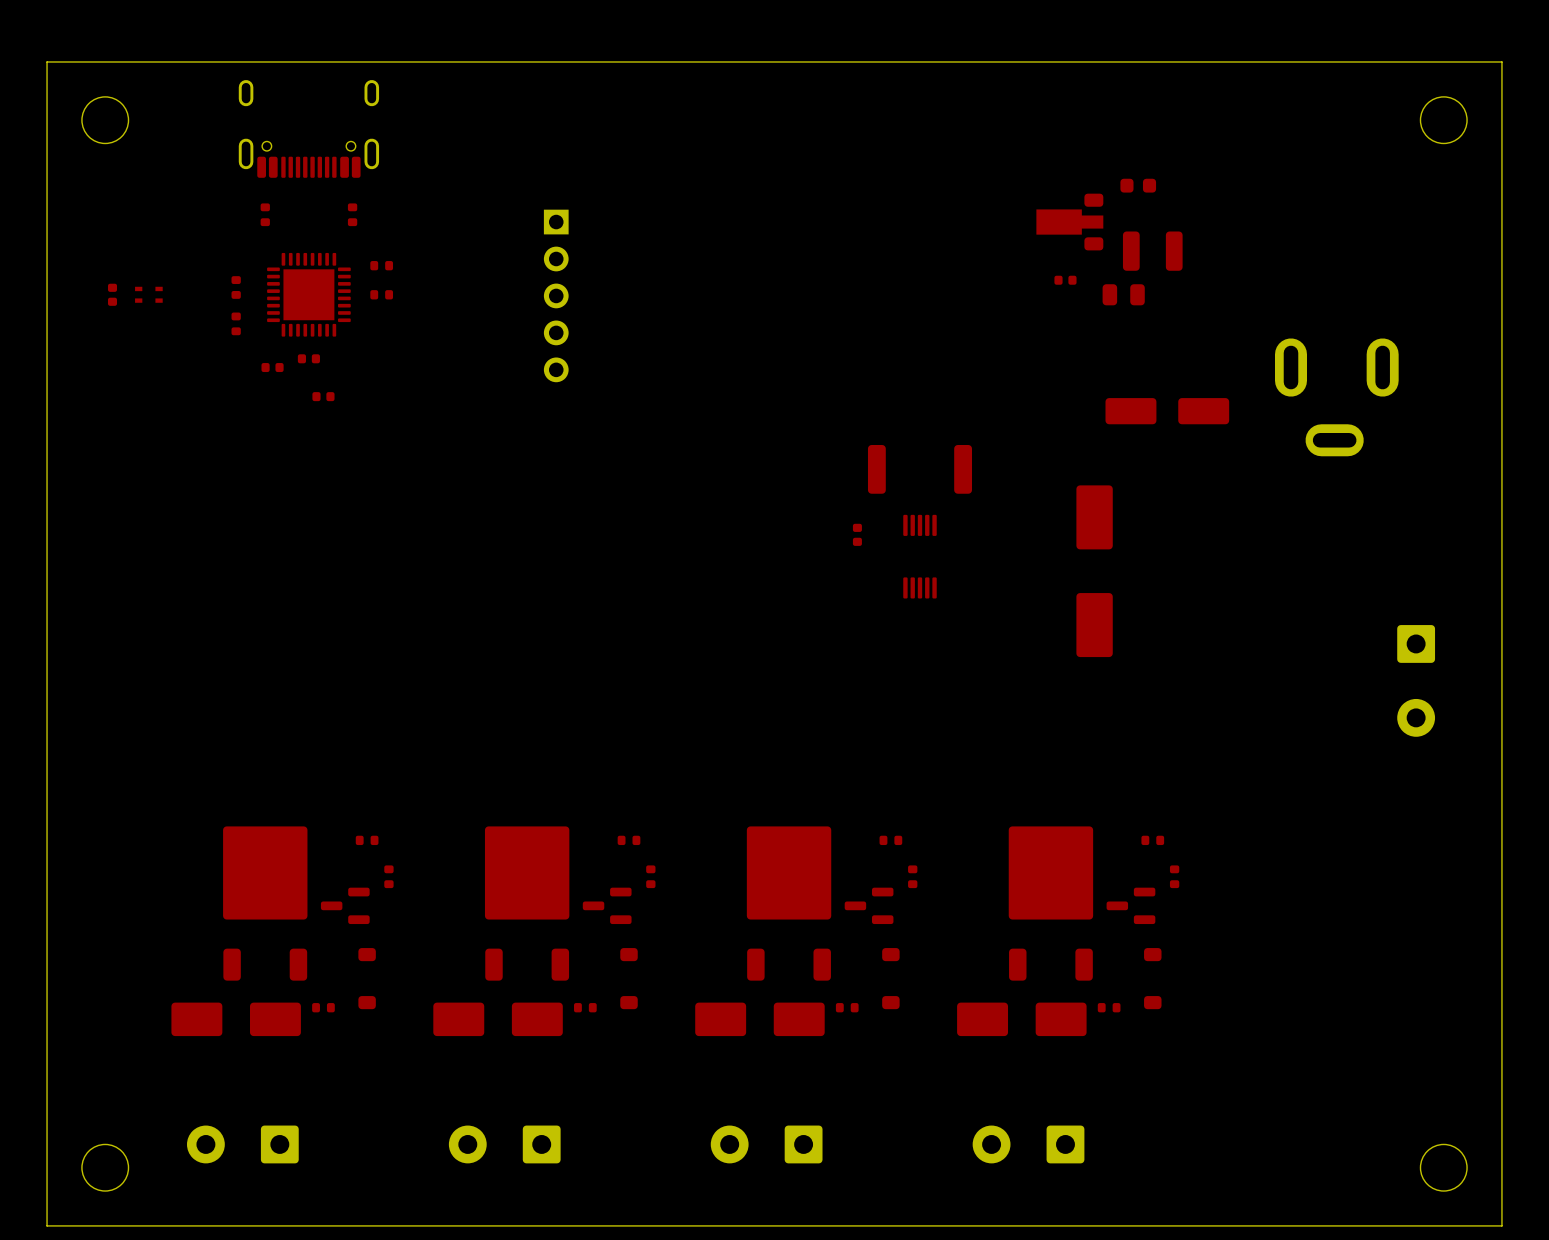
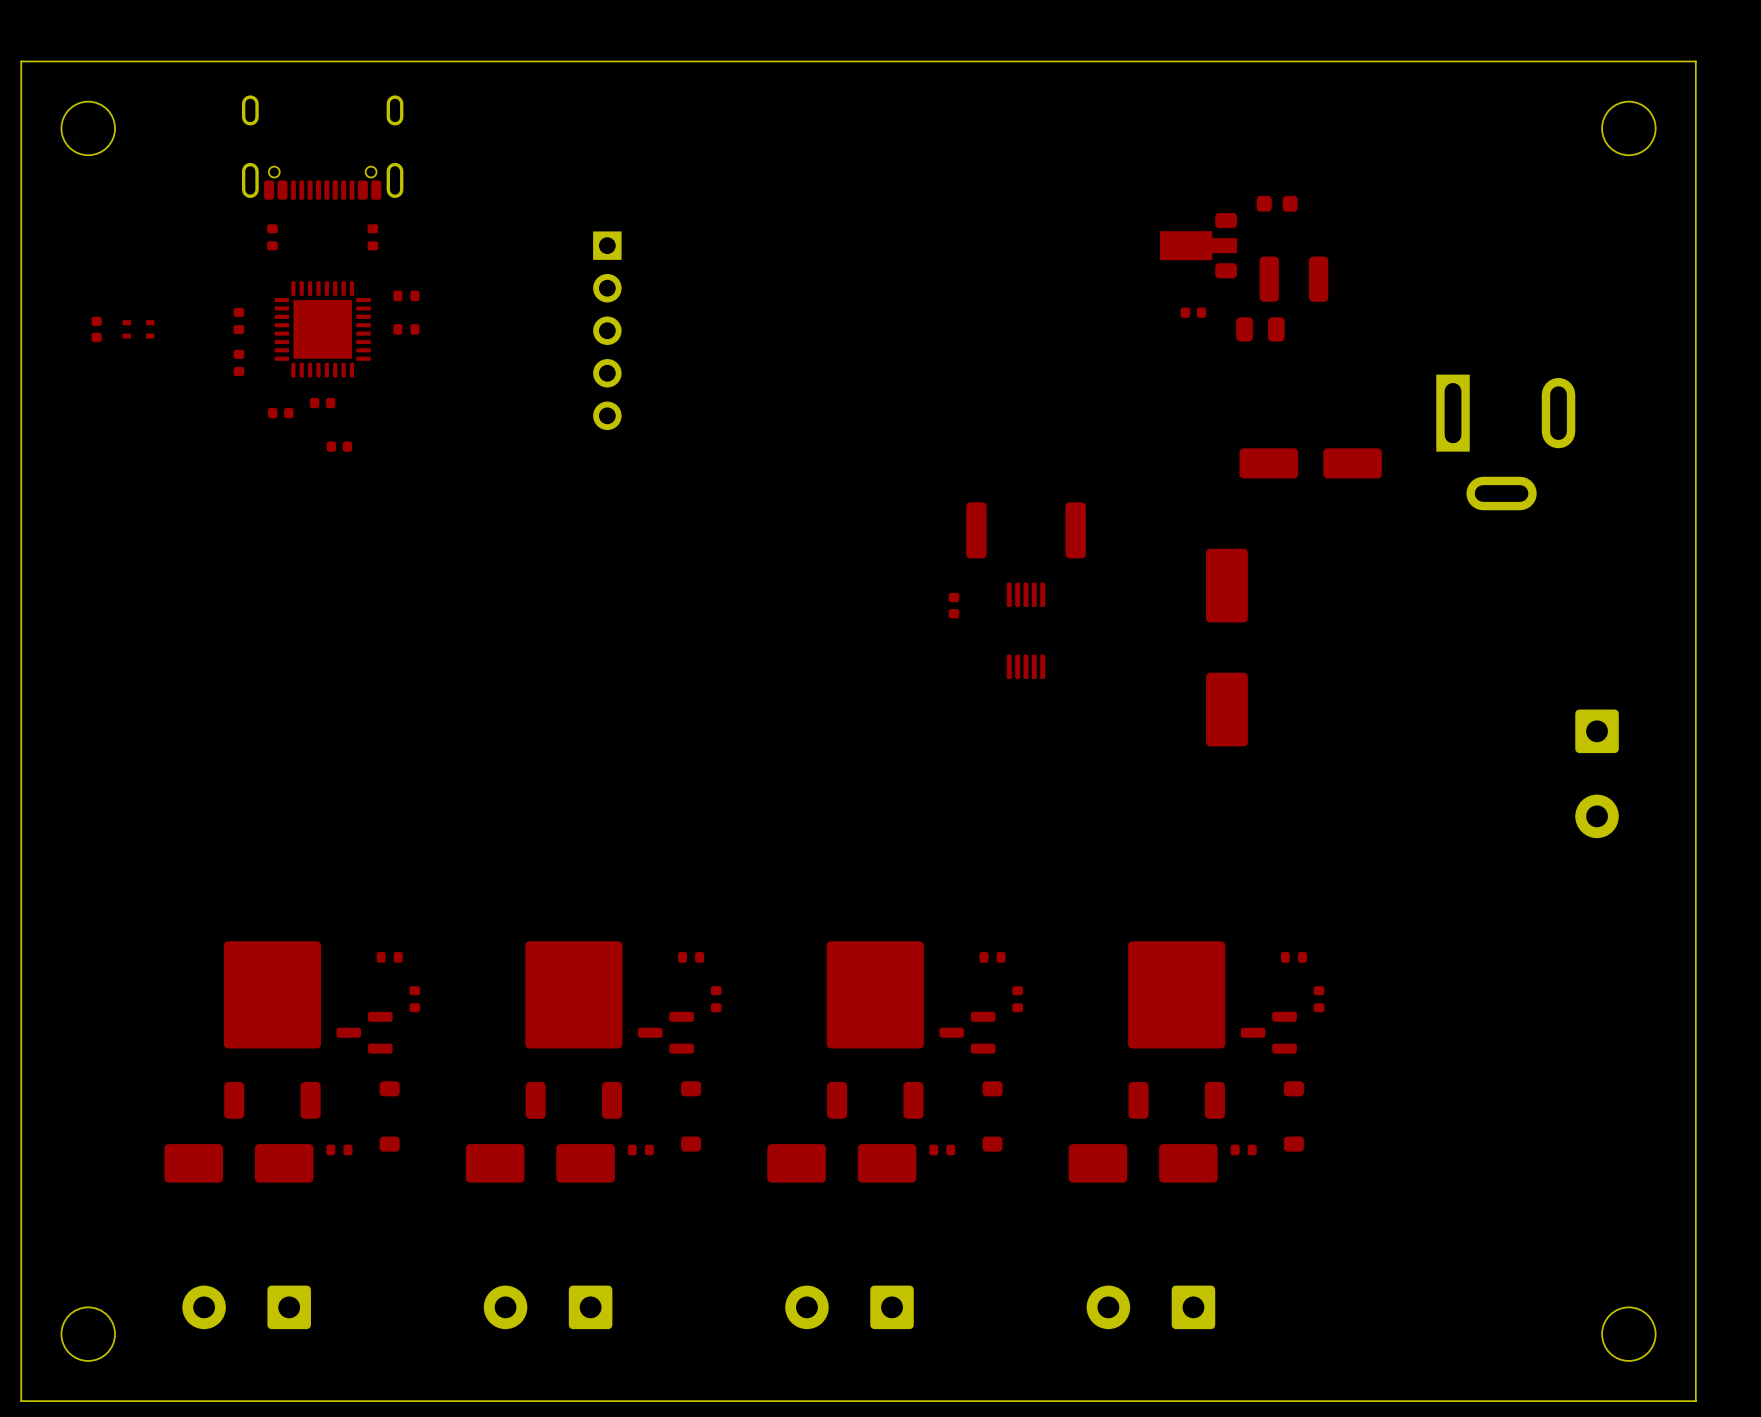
part footprint: [238, 80, 380, 178] -> [241, 95, 404, 200]
part footprint: [1274, 338, 1399, 457] -> [1436, 374, 1576, 511]

